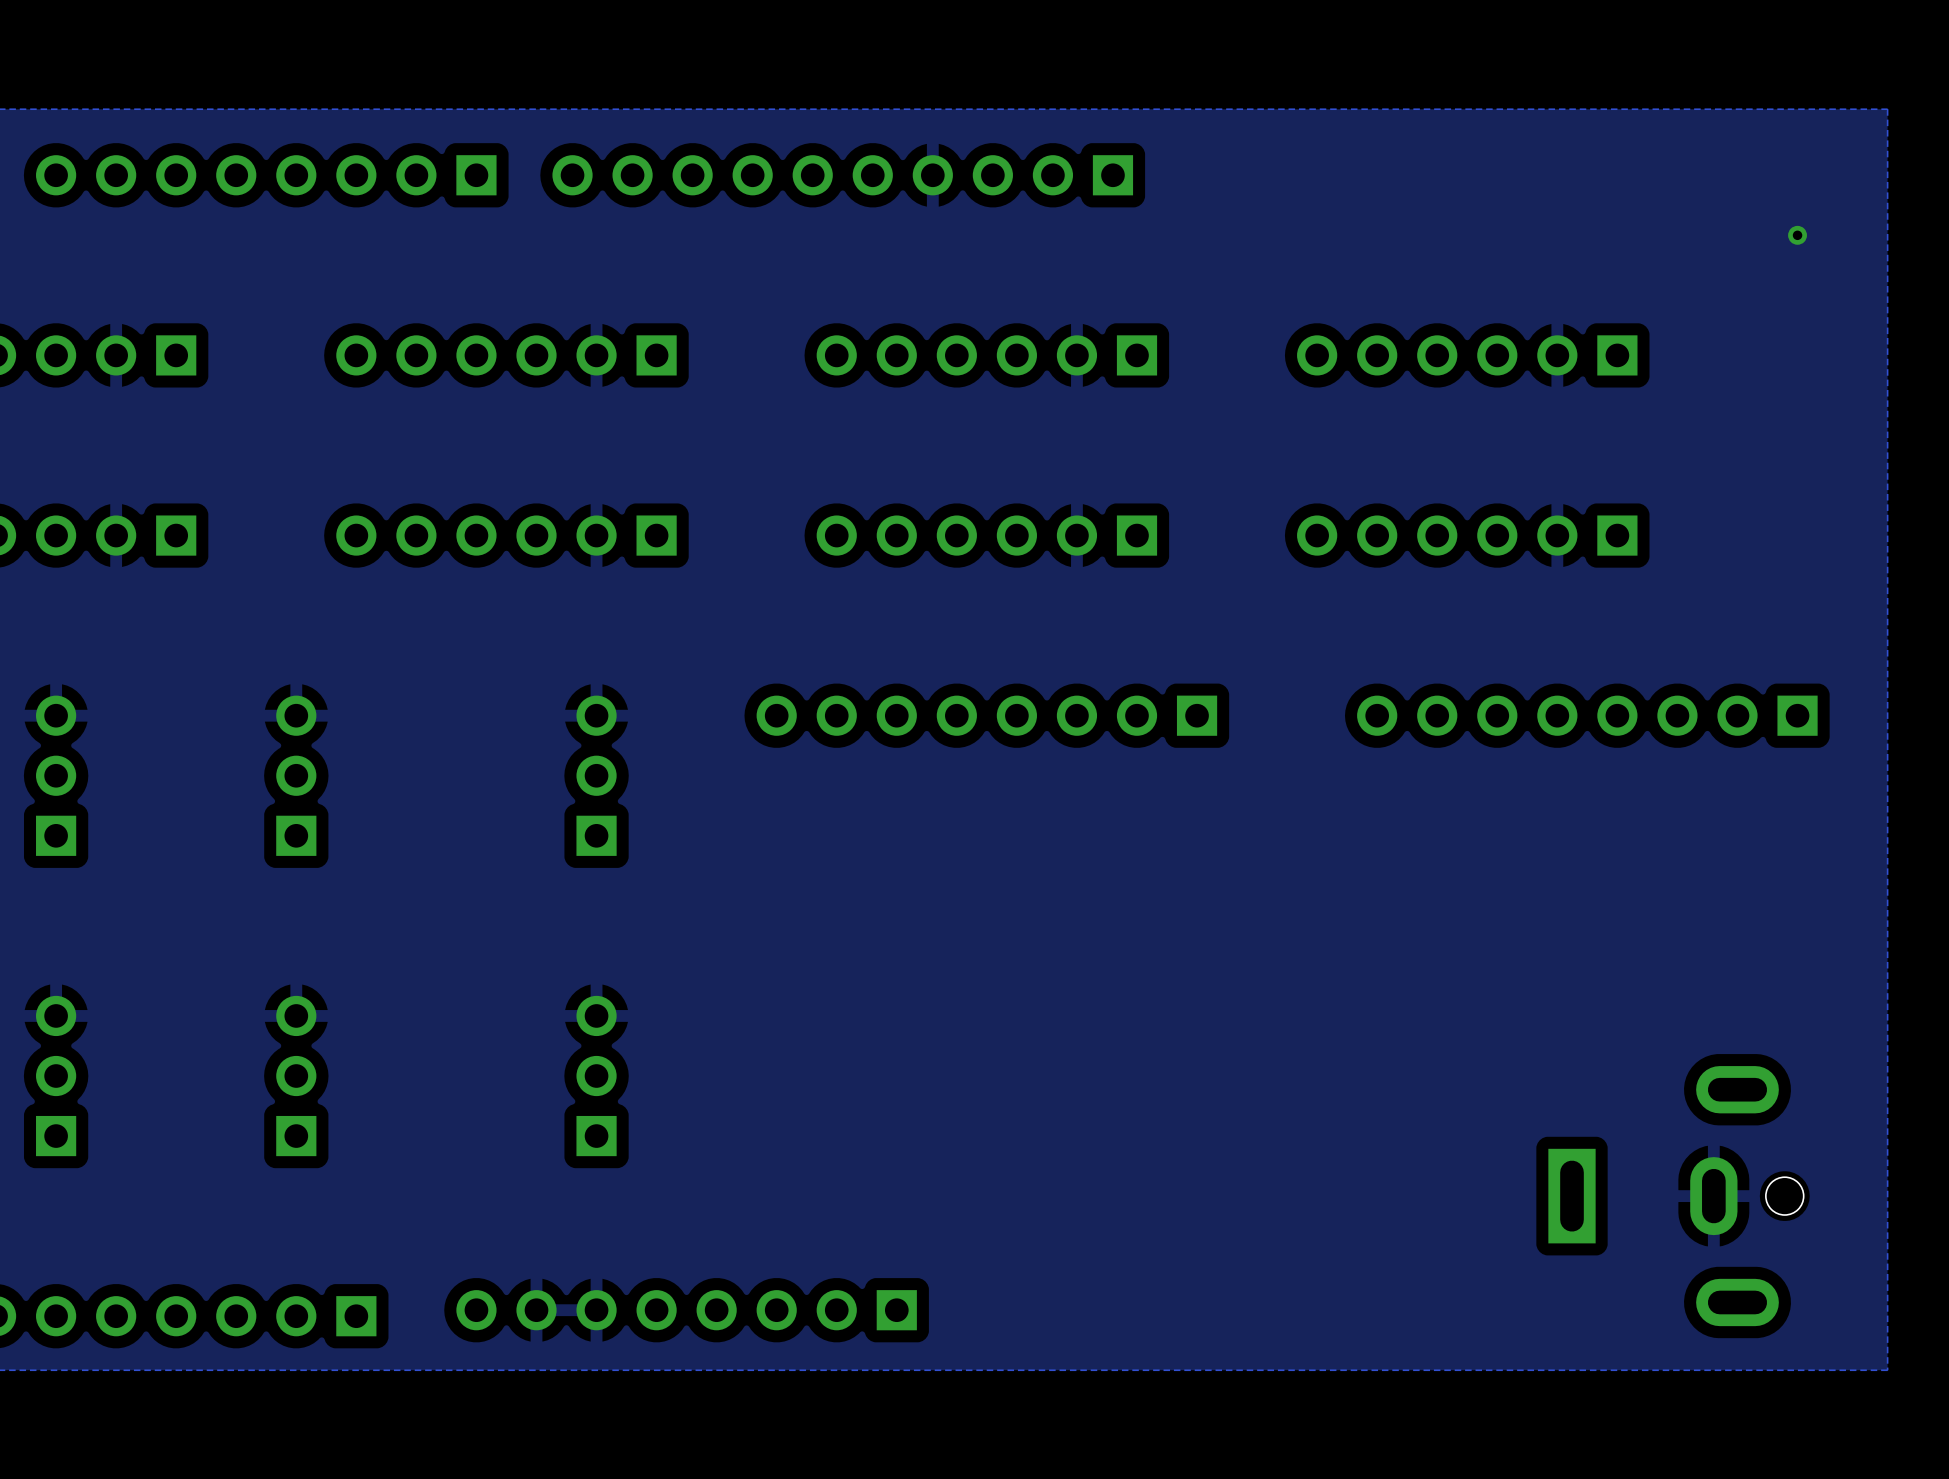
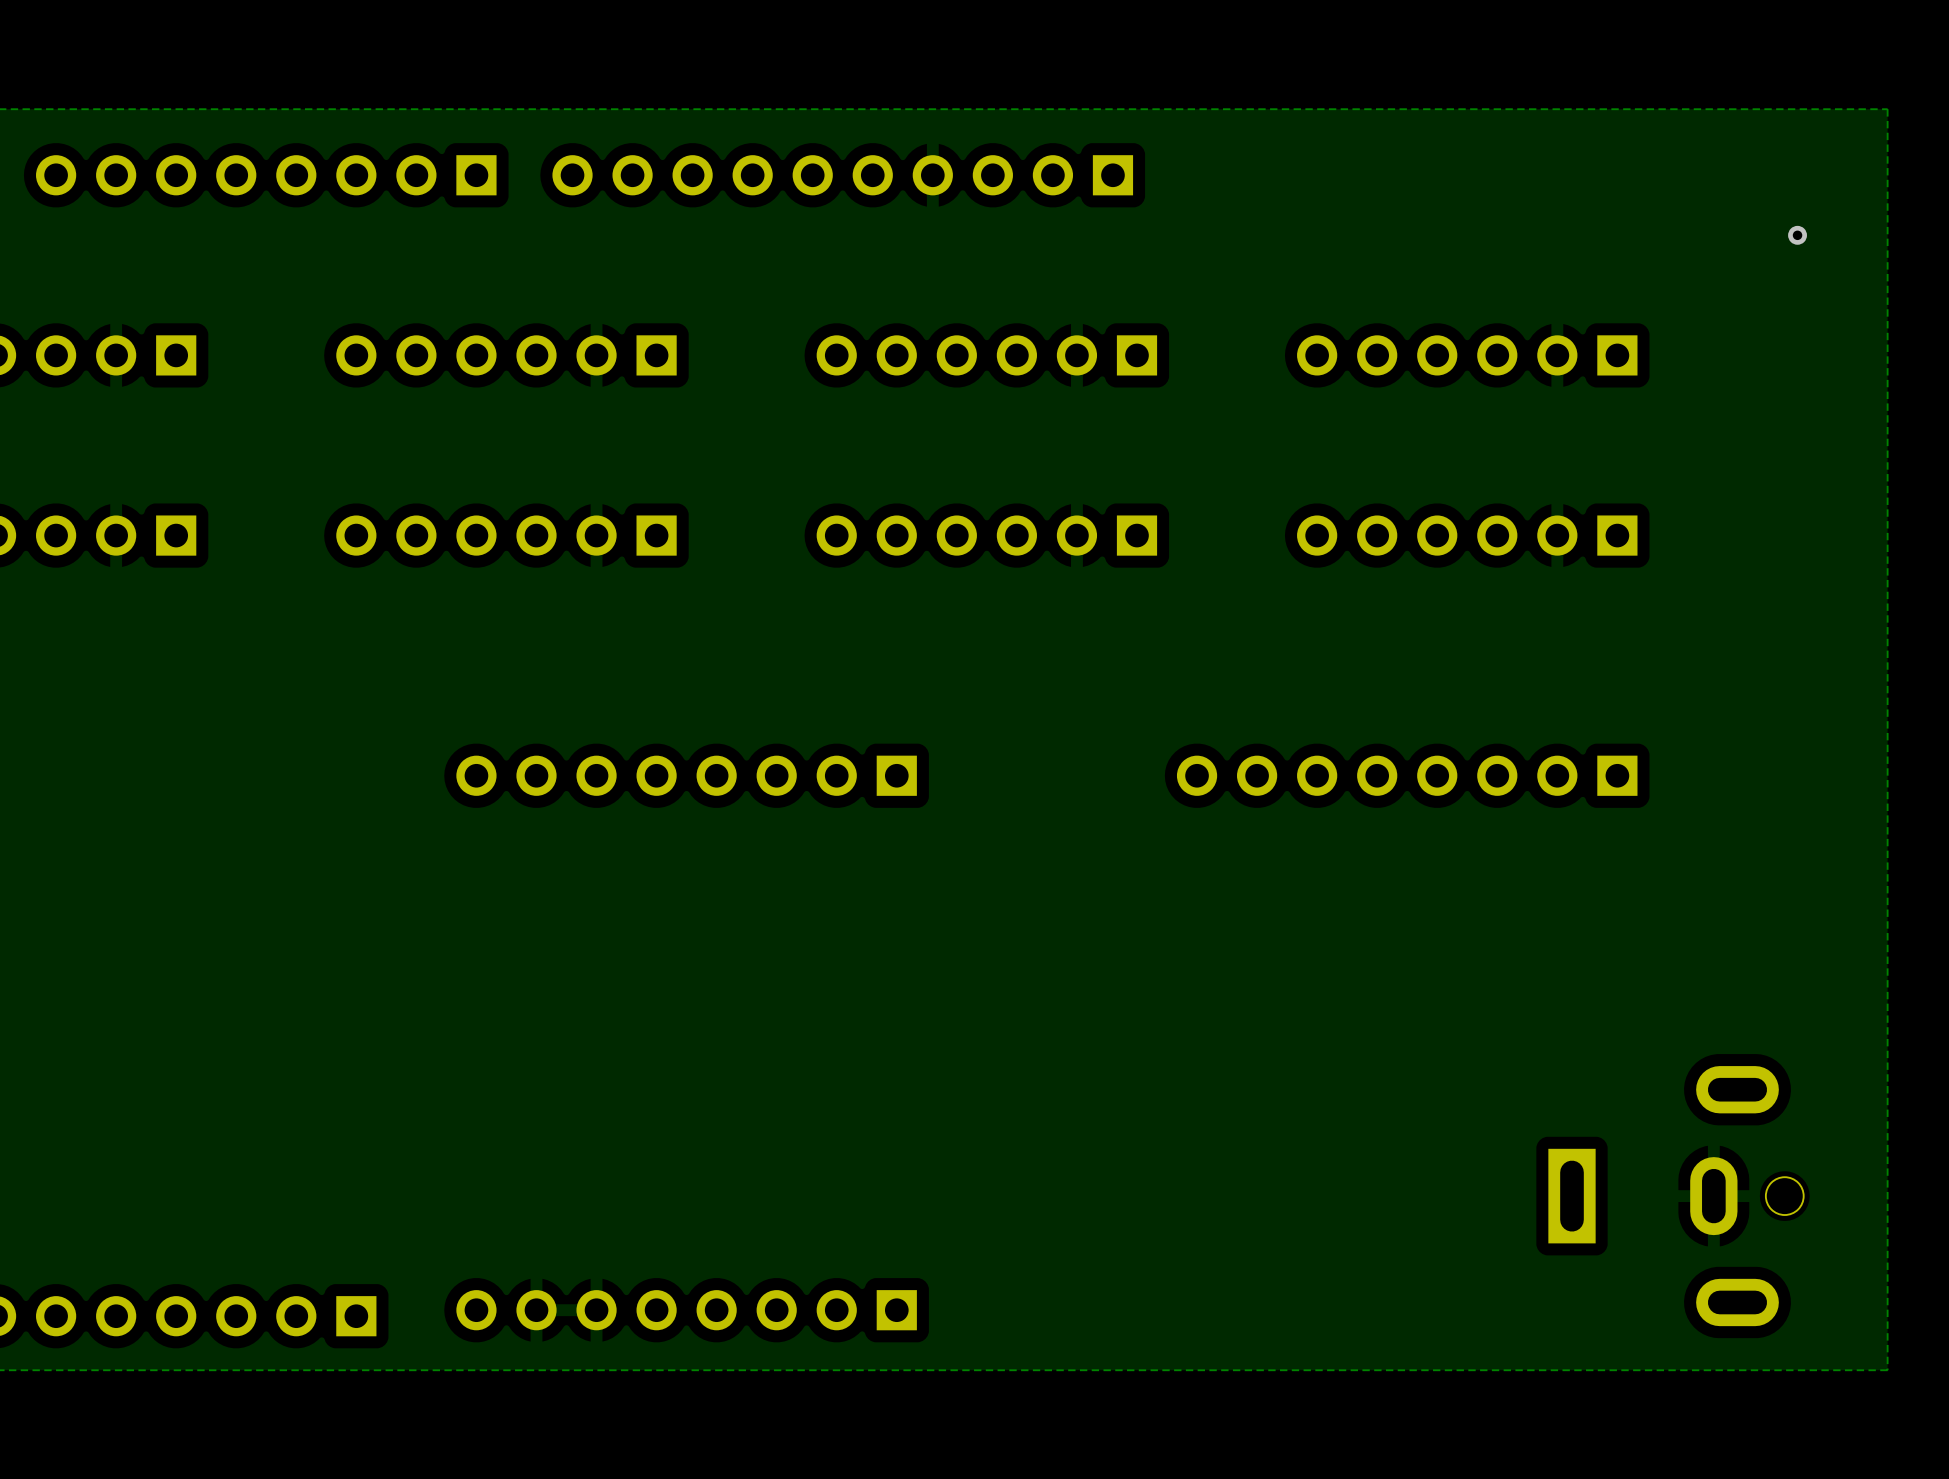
part: (986, 715) -> none
part position: (1587, 715) -> (1407, 775)
part: (56, 775) -> none
part: (296, 775) -> none
part: (596, 775) -> none
part: none -> (686, 775)
part: (56, 1076) -> none
part: (296, 1076) -> none
part: (596, 1076) -> none

